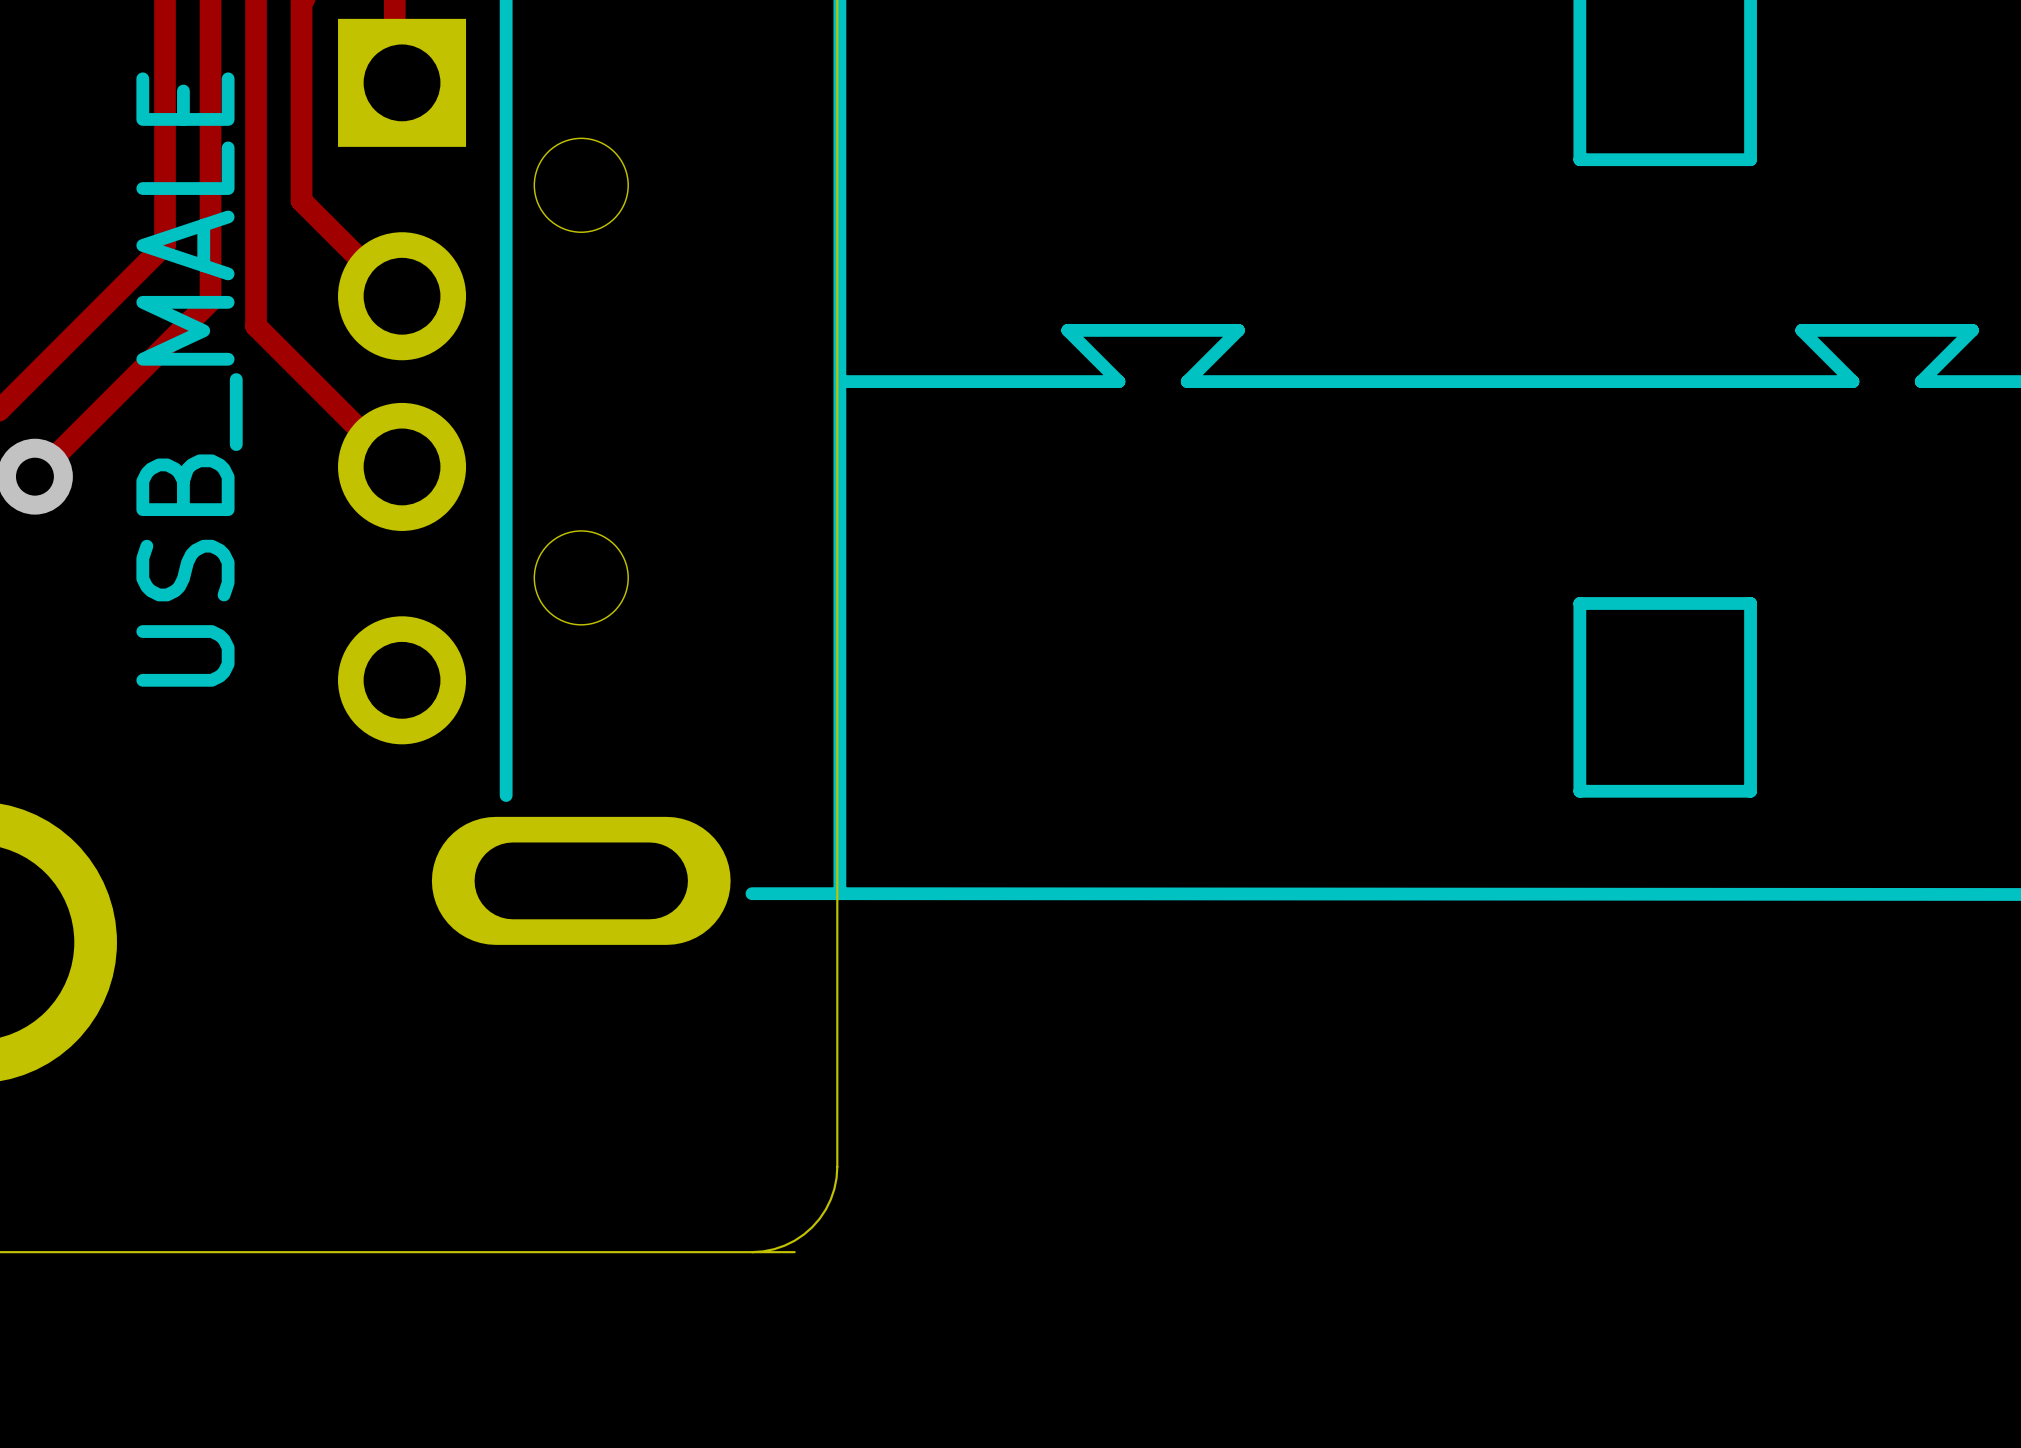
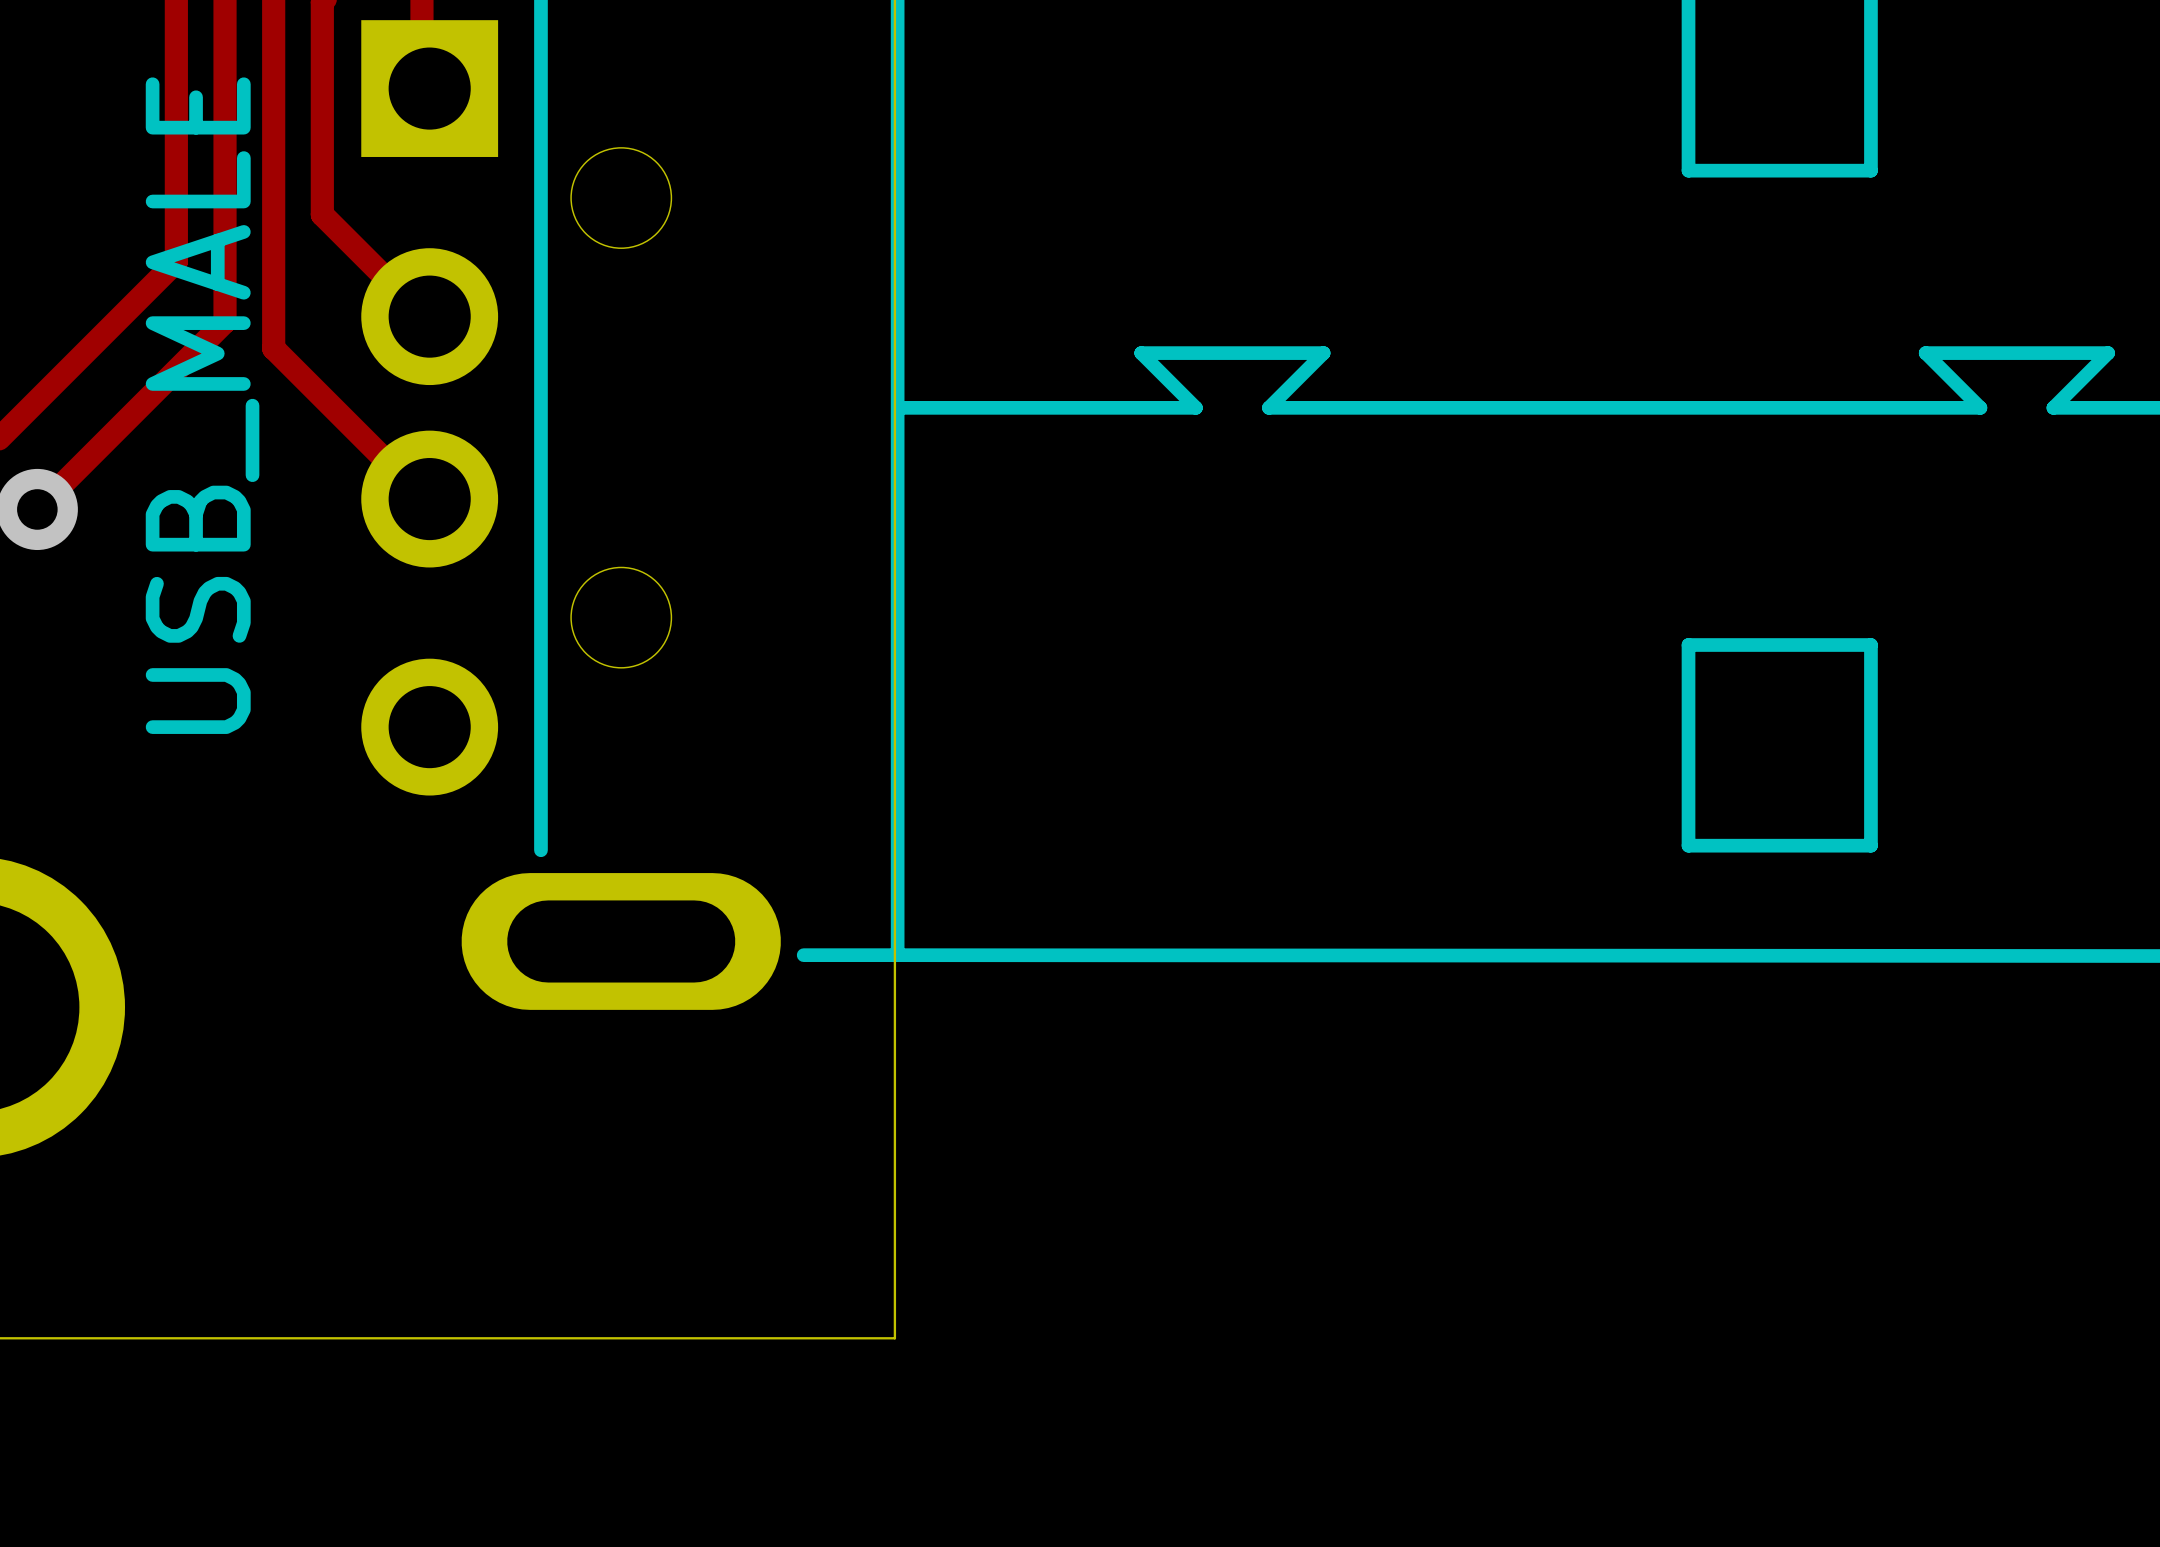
board edge: (837, 1166) (830, 1199) (812, 1227) (784, 1245) (751, 1252) -> (894, 1247) (894, 1338) (849, 1338)

